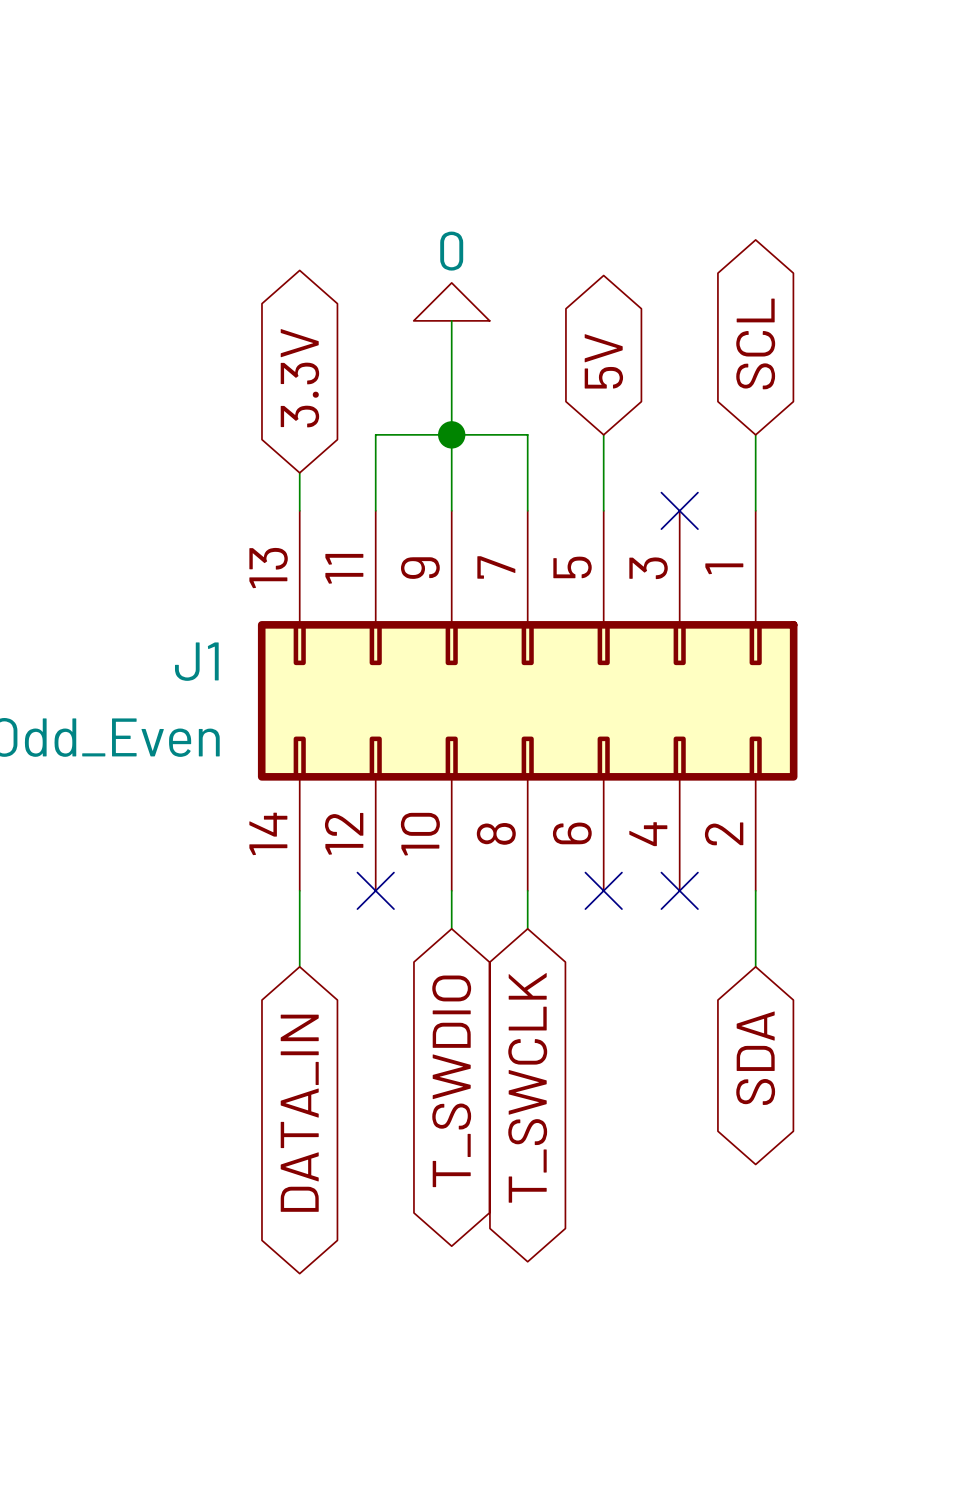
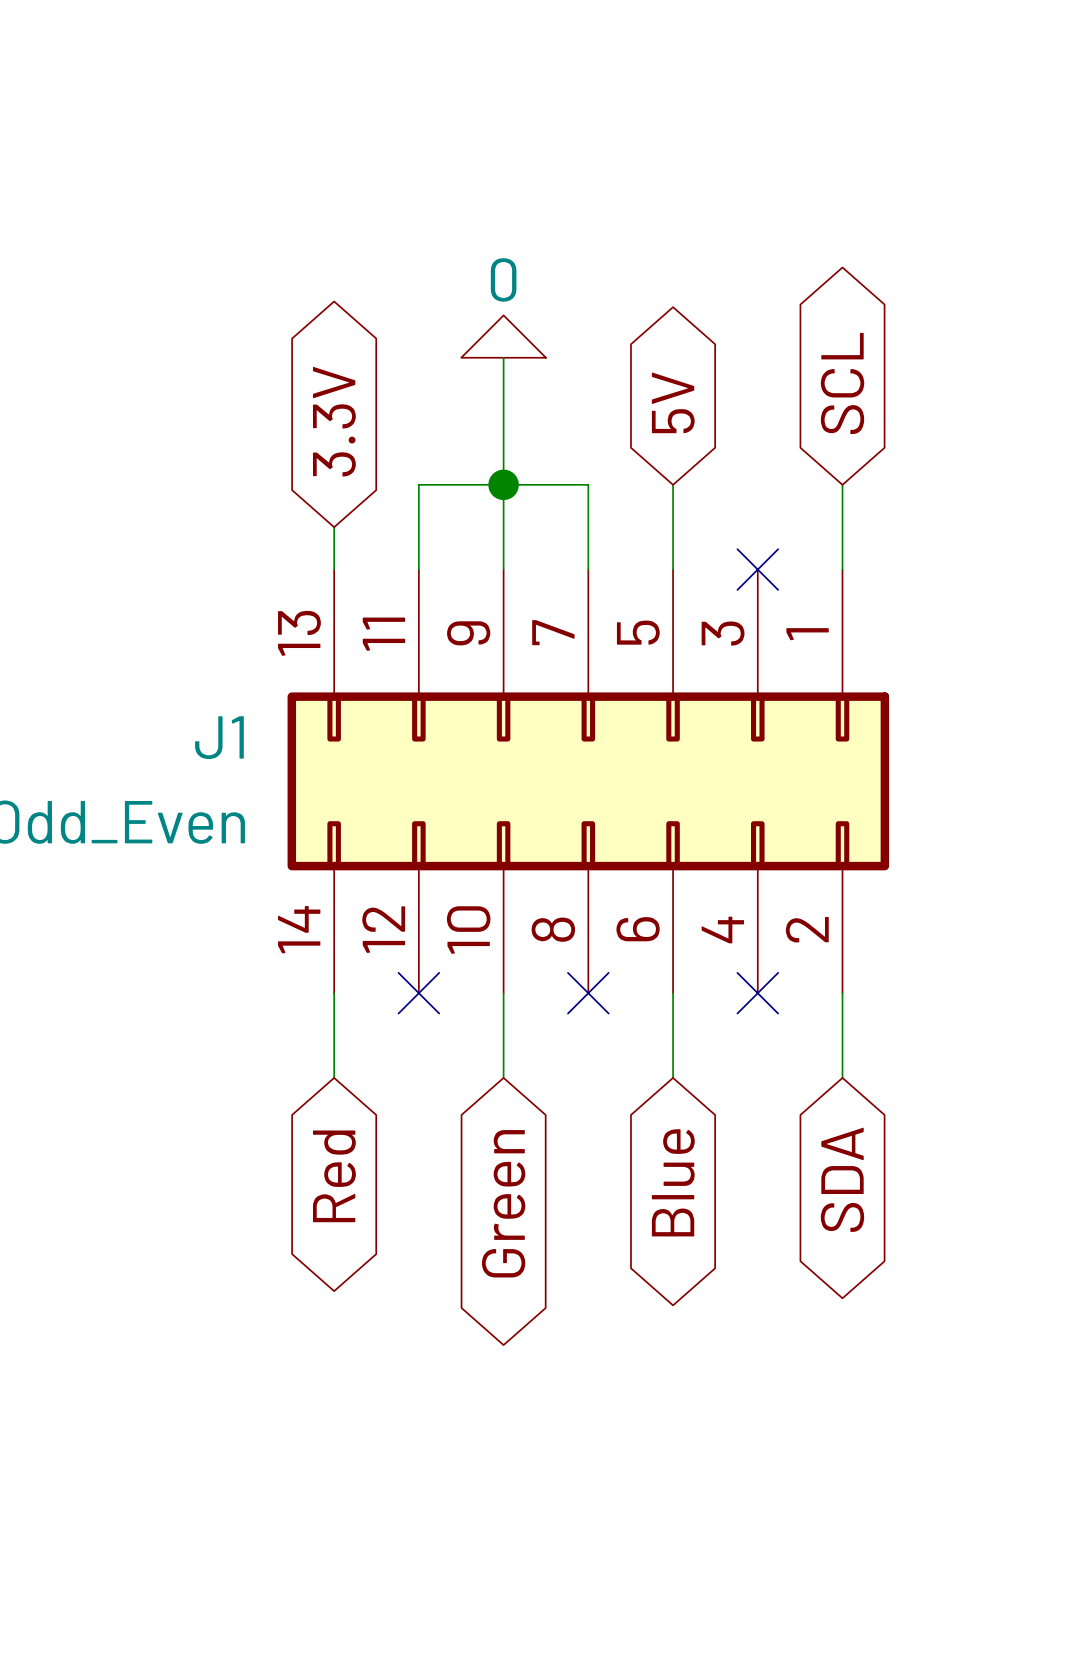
wire: (527, 890) (527, 928) -> (503, 1035) (503, 1077)
wire: none -> (673, 993) (673, 1077)
no-connect mark position: (603, 890) -> (588, 993)
global label: none -> Blue (673, 1182)
global label: none -> Green (503, 1203)
global label: T_SWDIO (451, 1081) -> none
global label: T_SWCLK (527, 1087) -> none
global label: DATA_IN (299, 1113) -> Red (334, 1176)

